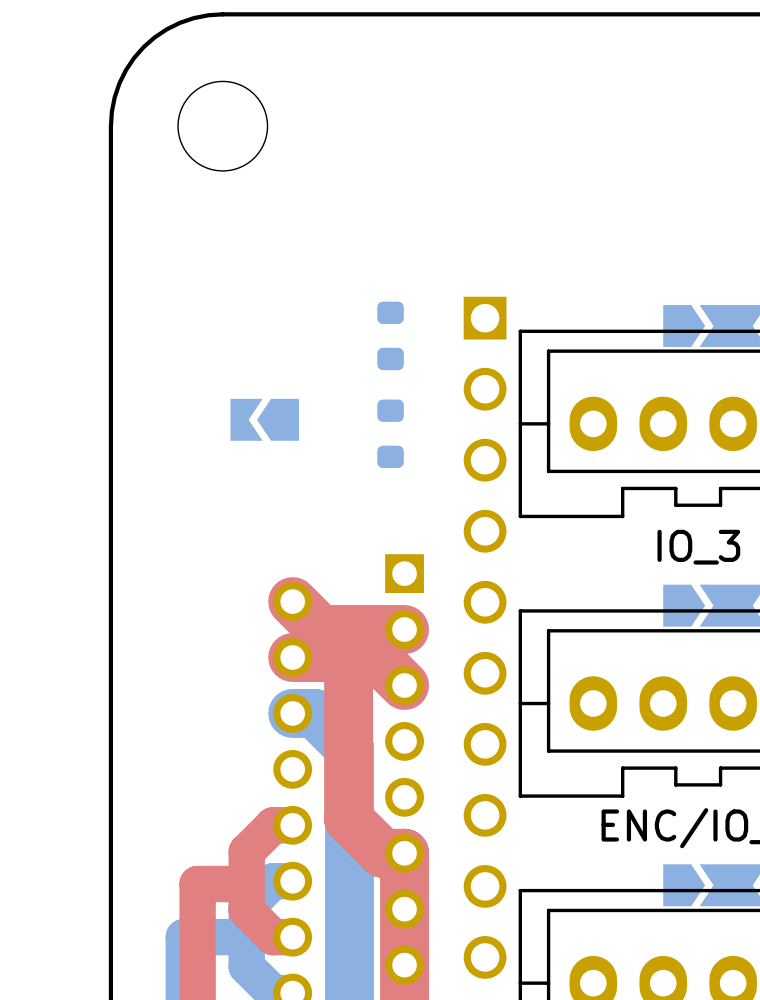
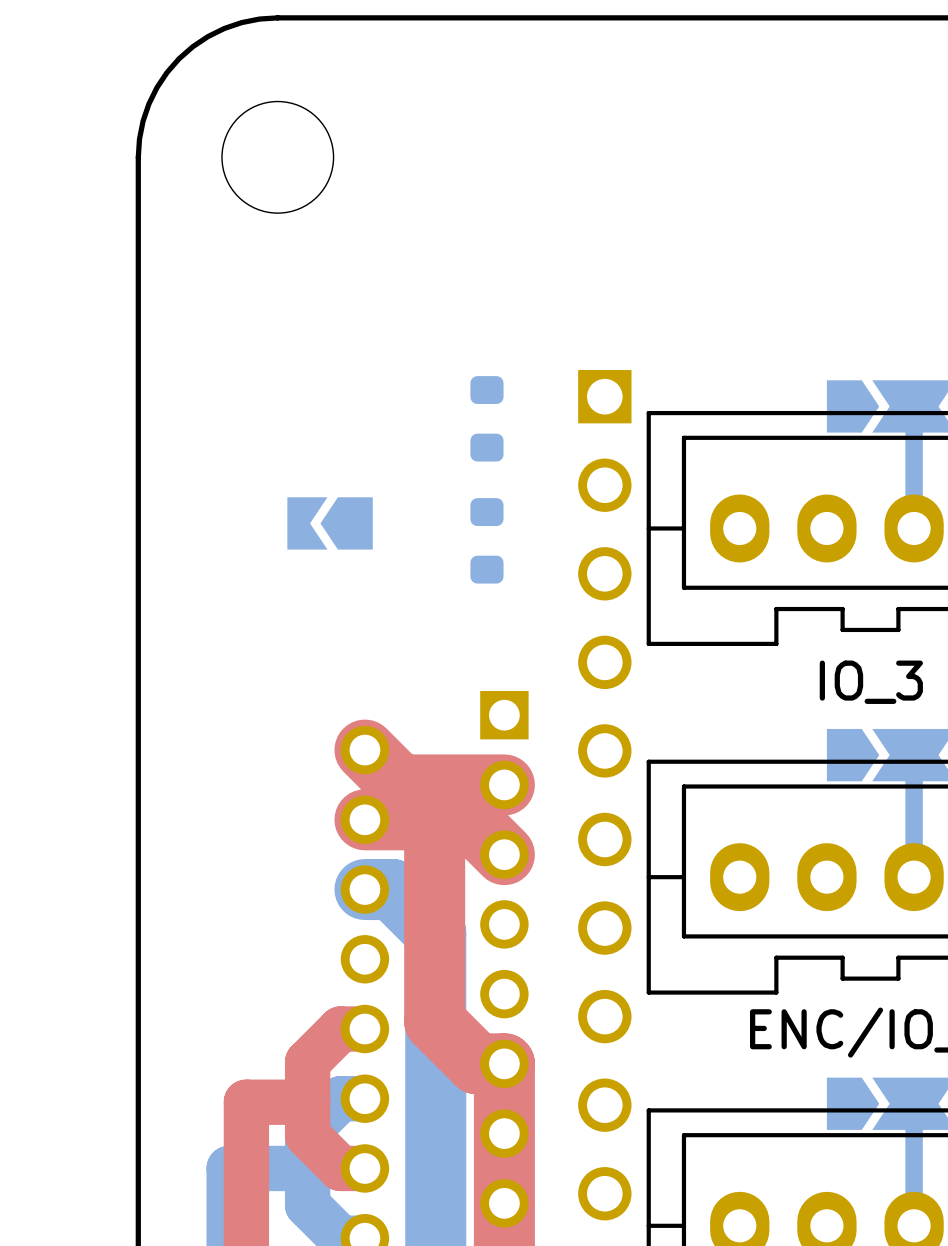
bottom track: none -> (914, 406) (914, 528)
bottom track: none -> (914, 755) (914, 877)
bottom track: none -> (914, 1103) (914, 1225)

